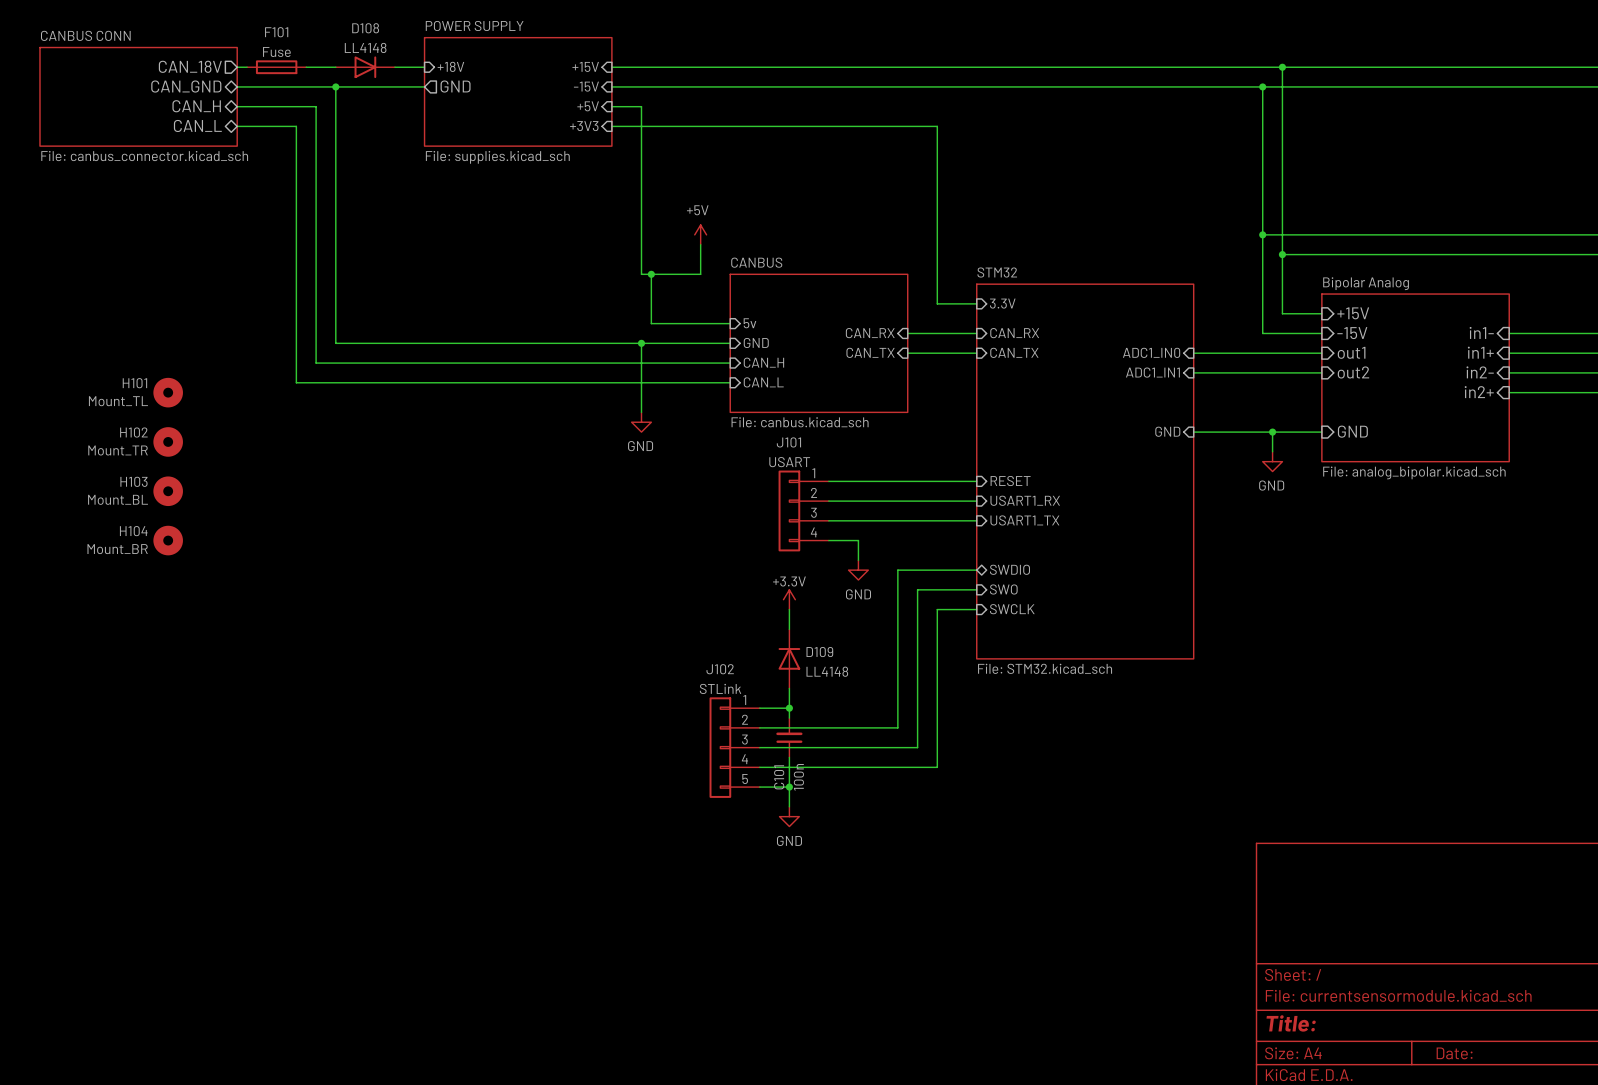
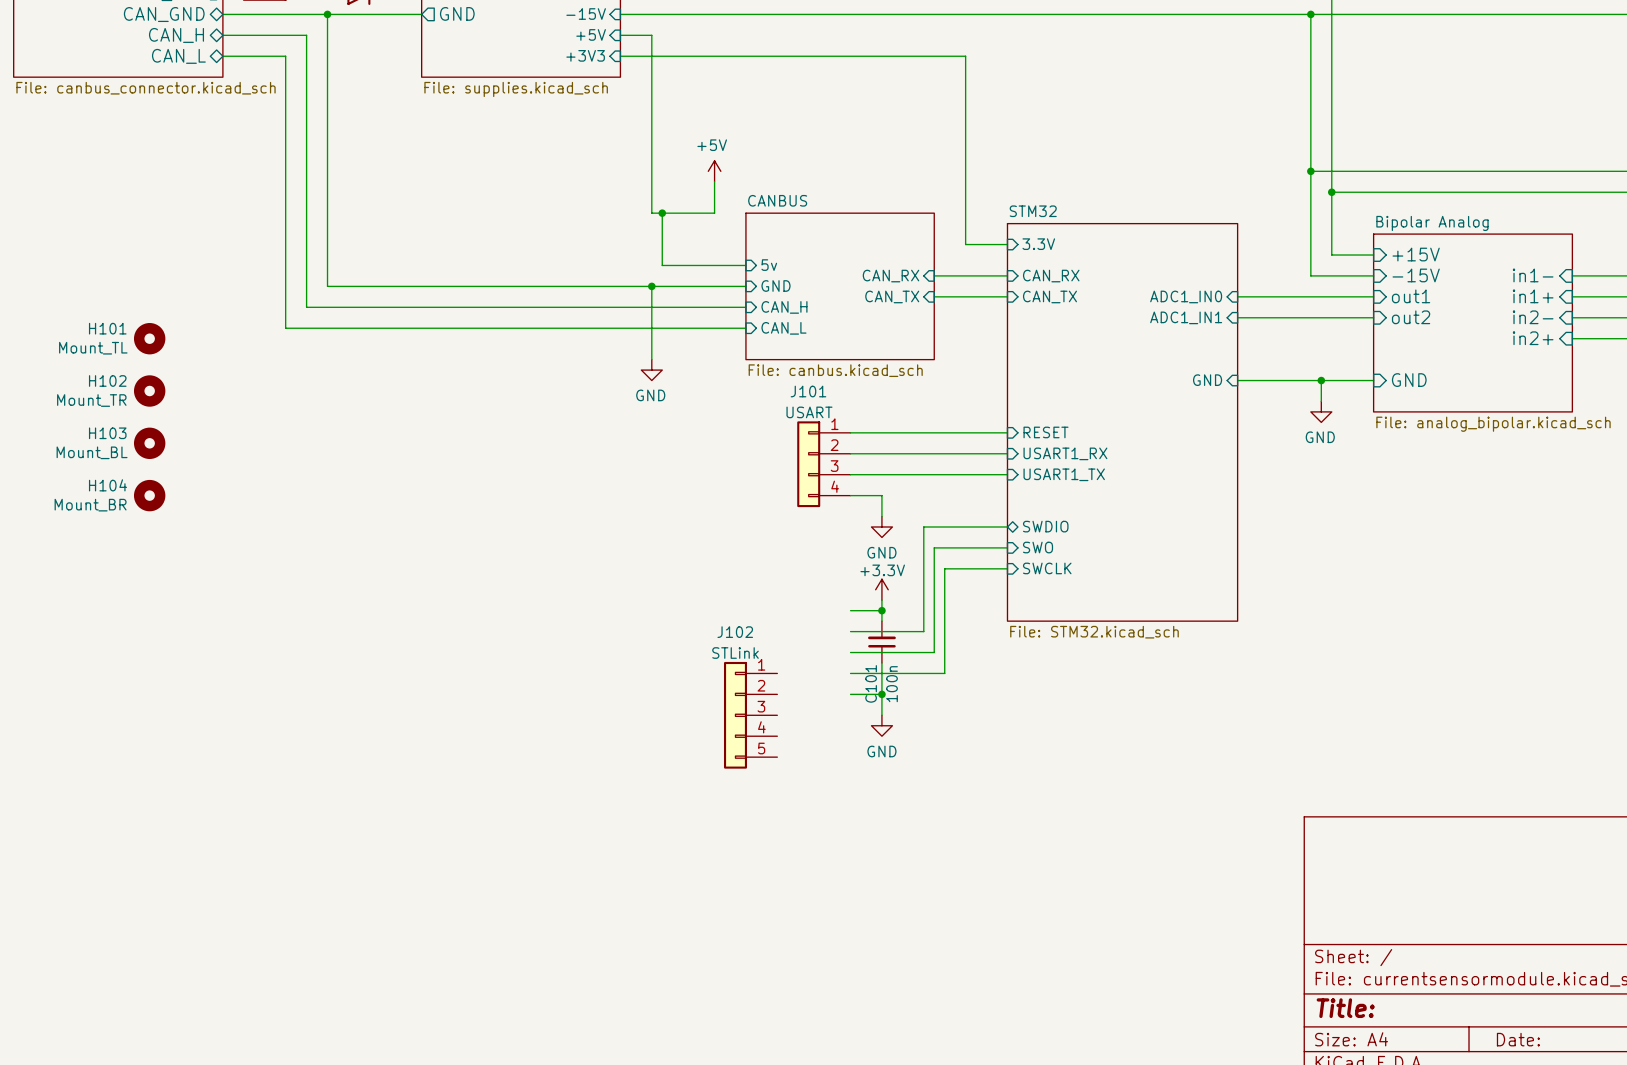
wire: (917, 589) (917, 609) -> (965, 568) (944, 568)
wire: none -> (944, 547) (934, 547) (934, 652) (850, 652)
power symbol position: +3.3V (789, 599) -> +3.3V (881, 589)
wire: (789, 609) (789, 629) -> (881, 600) (881, 621)
wire: (937, 609) (937, 767) (759, 767) -> none
junction: none -> (881, 610)
D109: LL4148 (789, 658) -> none
wire: (897, 668) (897, 727) (858, 727) -> (923, 631) (850, 631)
wire: (789, 688) (789, 718) -> none
wire: (759, 708) (789, 708) -> (850, 610) (881, 610)
junction: (789, 708) -> none
wire: (917, 708) (917, 747) (759, 747) -> (944, 673) (850, 673)
wire: (759, 727) (828, 727) -> none
junction: none -> (881, 694)
C101 position: (789, 737) -> (881, 642)
wire: (789, 757) (789, 806) -> (881, 662) (881, 715)
wire: (759, 787) (789, 787) -> none
junction: (789, 787) -> none
power symbol position: GND (789, 816) -> GND (881, 725)

